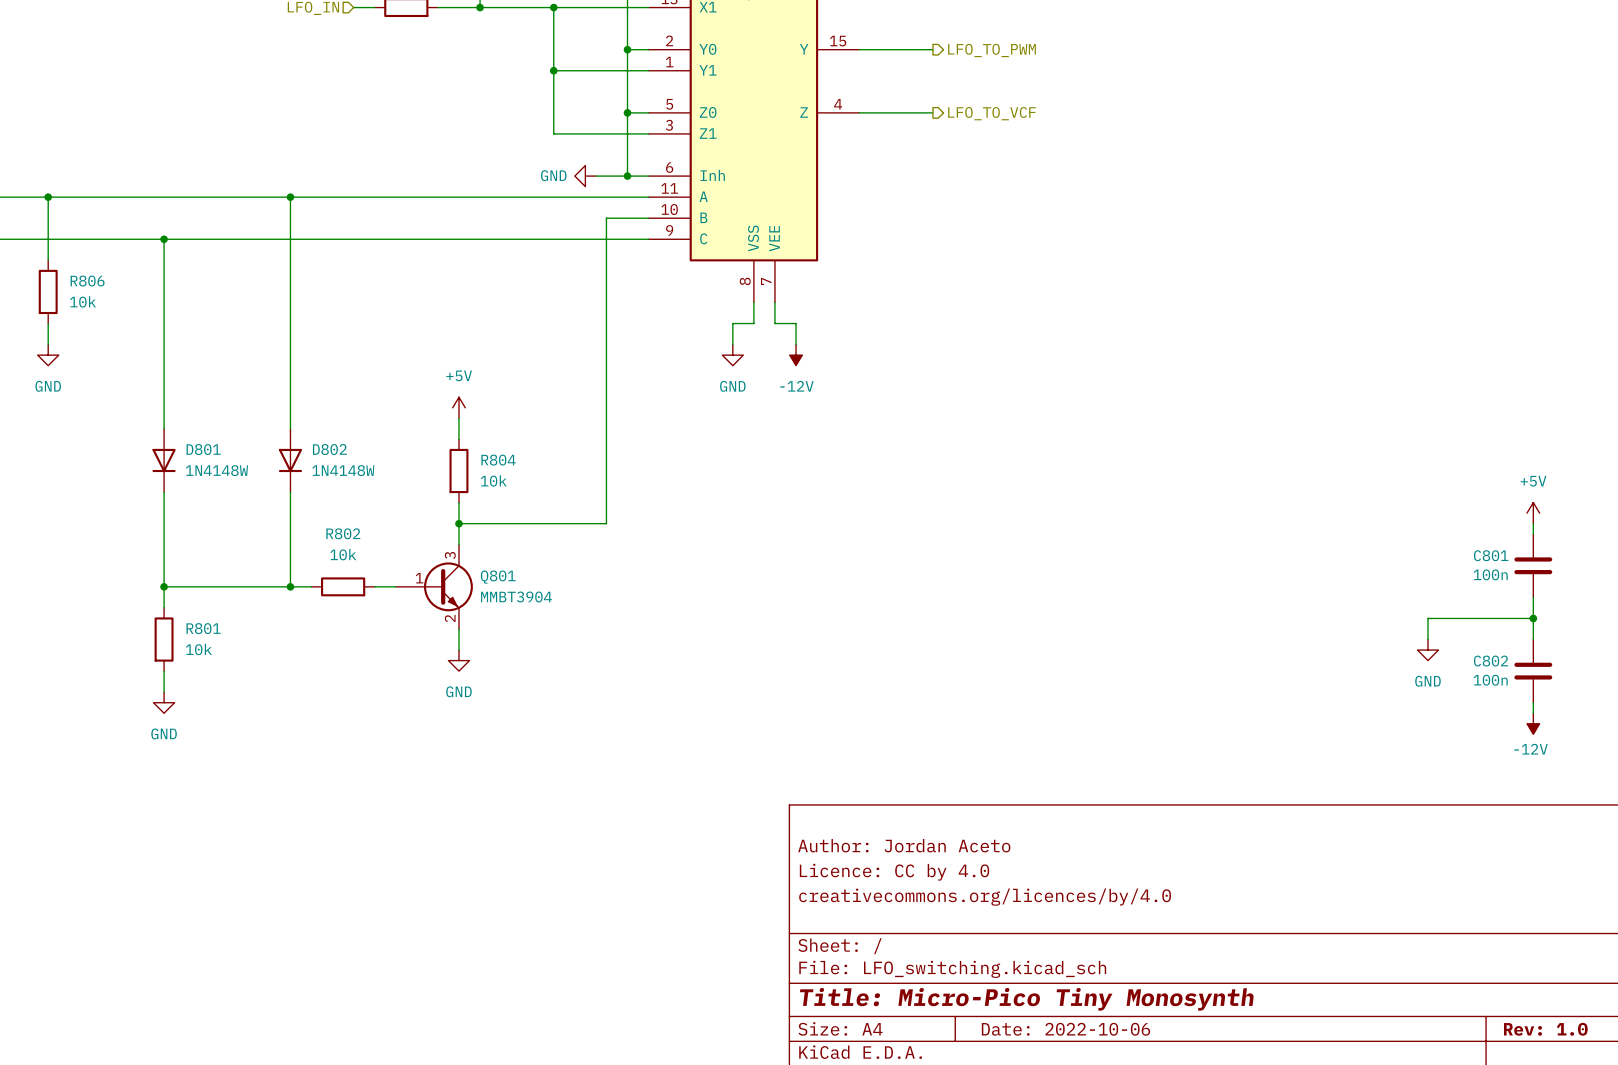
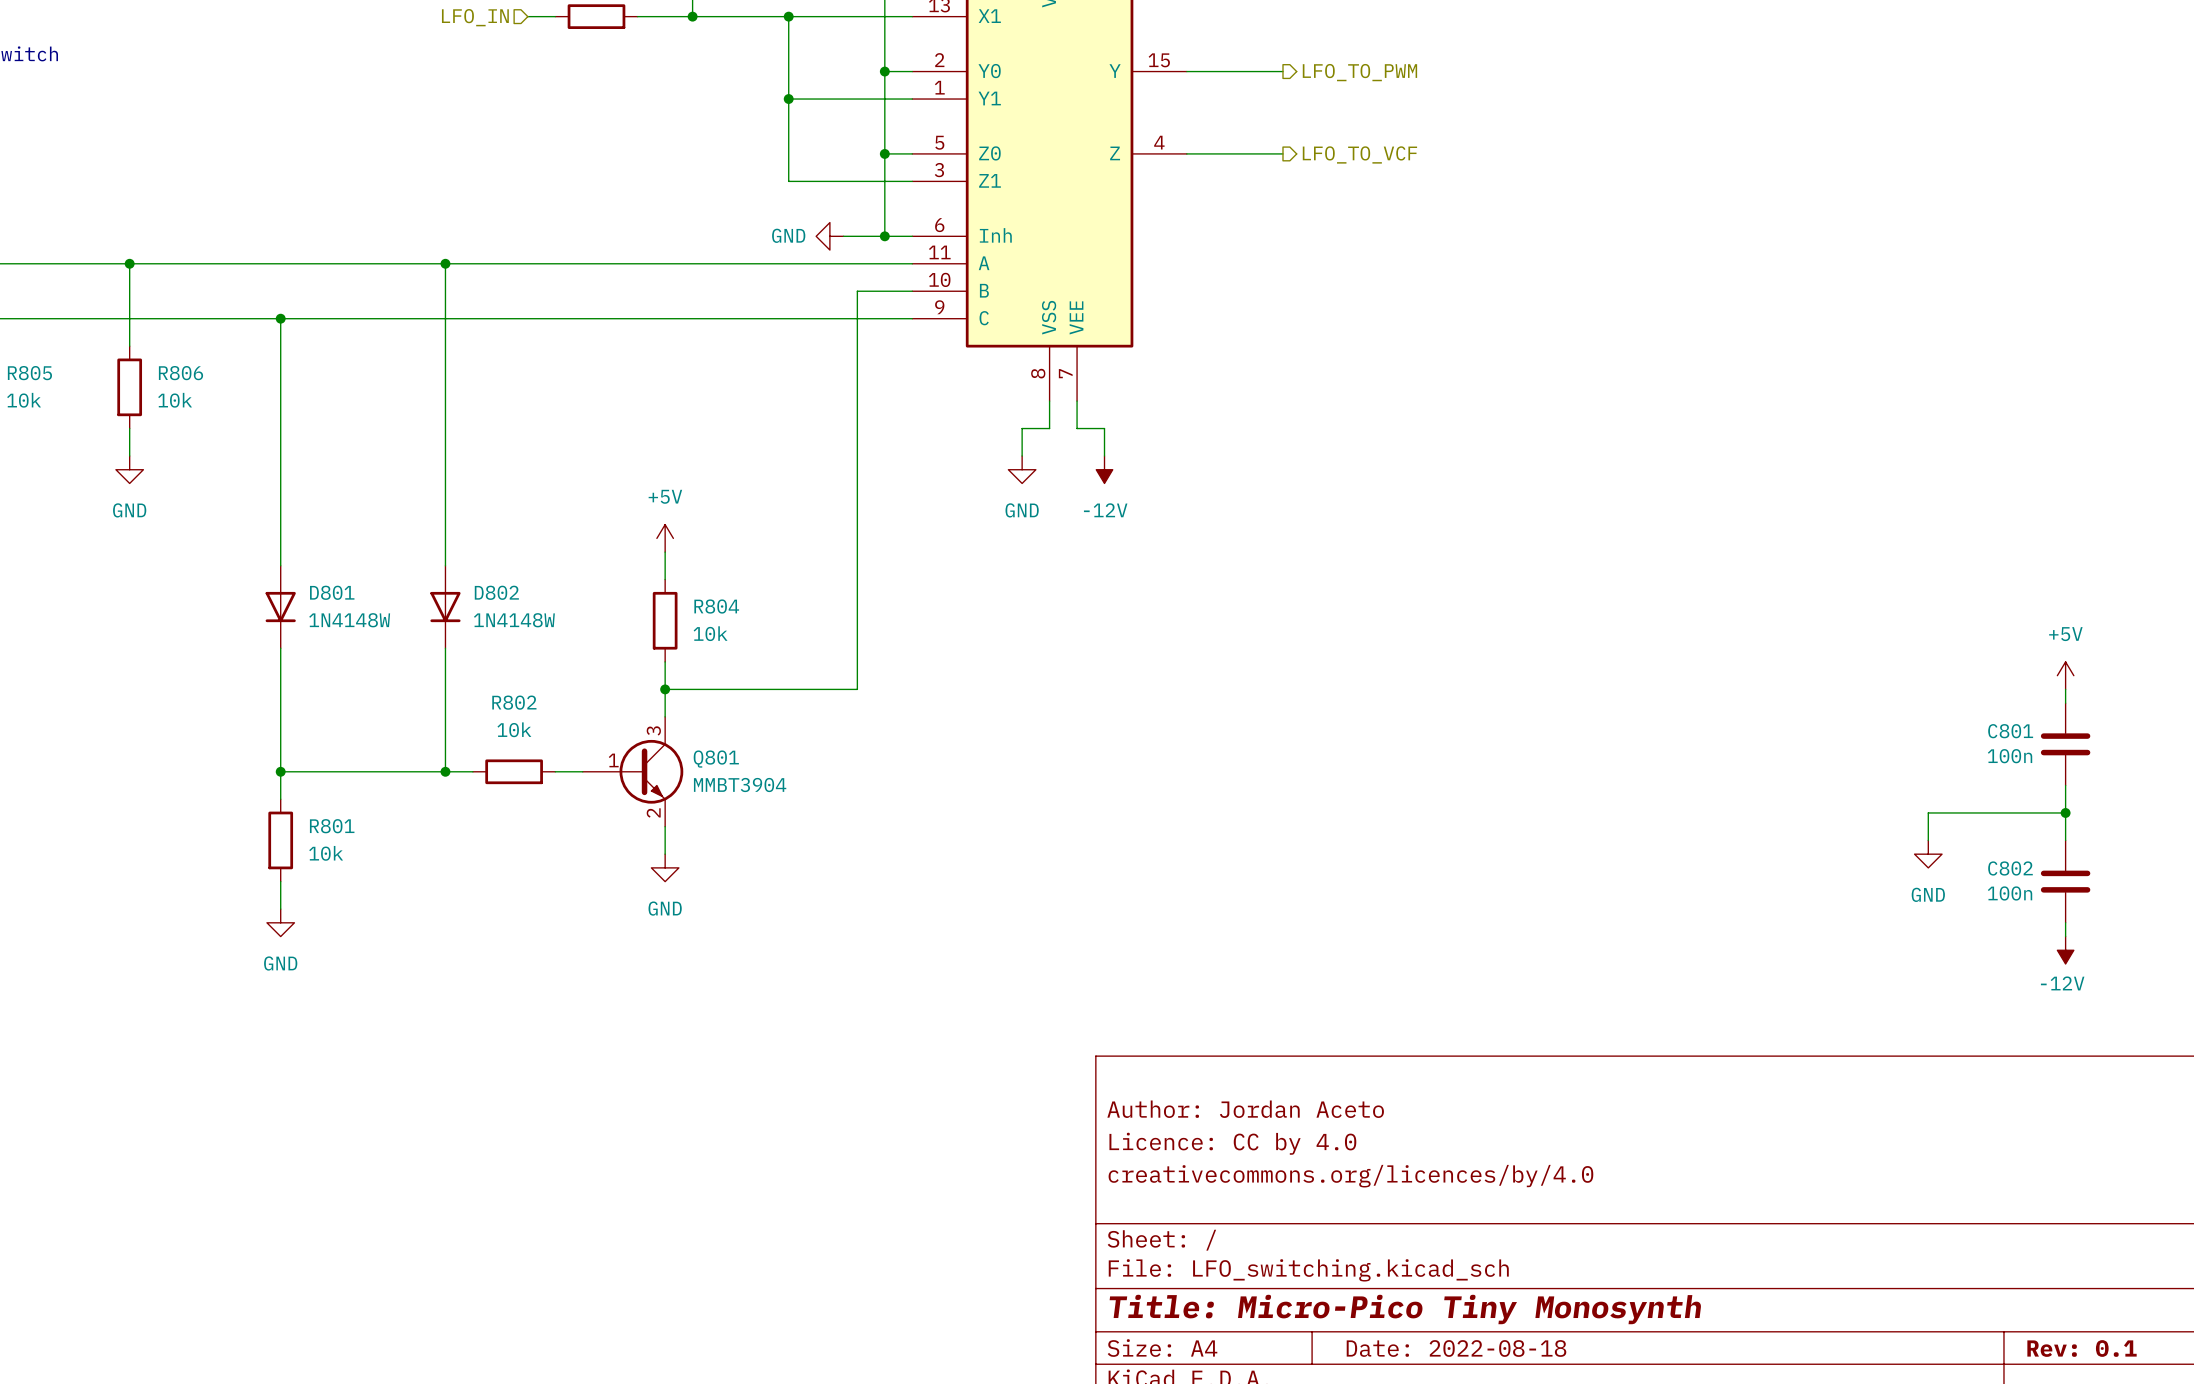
title block: Date: 2022-10-06 (1065, 1029) -> Date: 2022-08-18 (1456, 1348)
title block: Rev: 1.0 (1545, 1029) -> Rev: 0.1 (2082, 1348)

